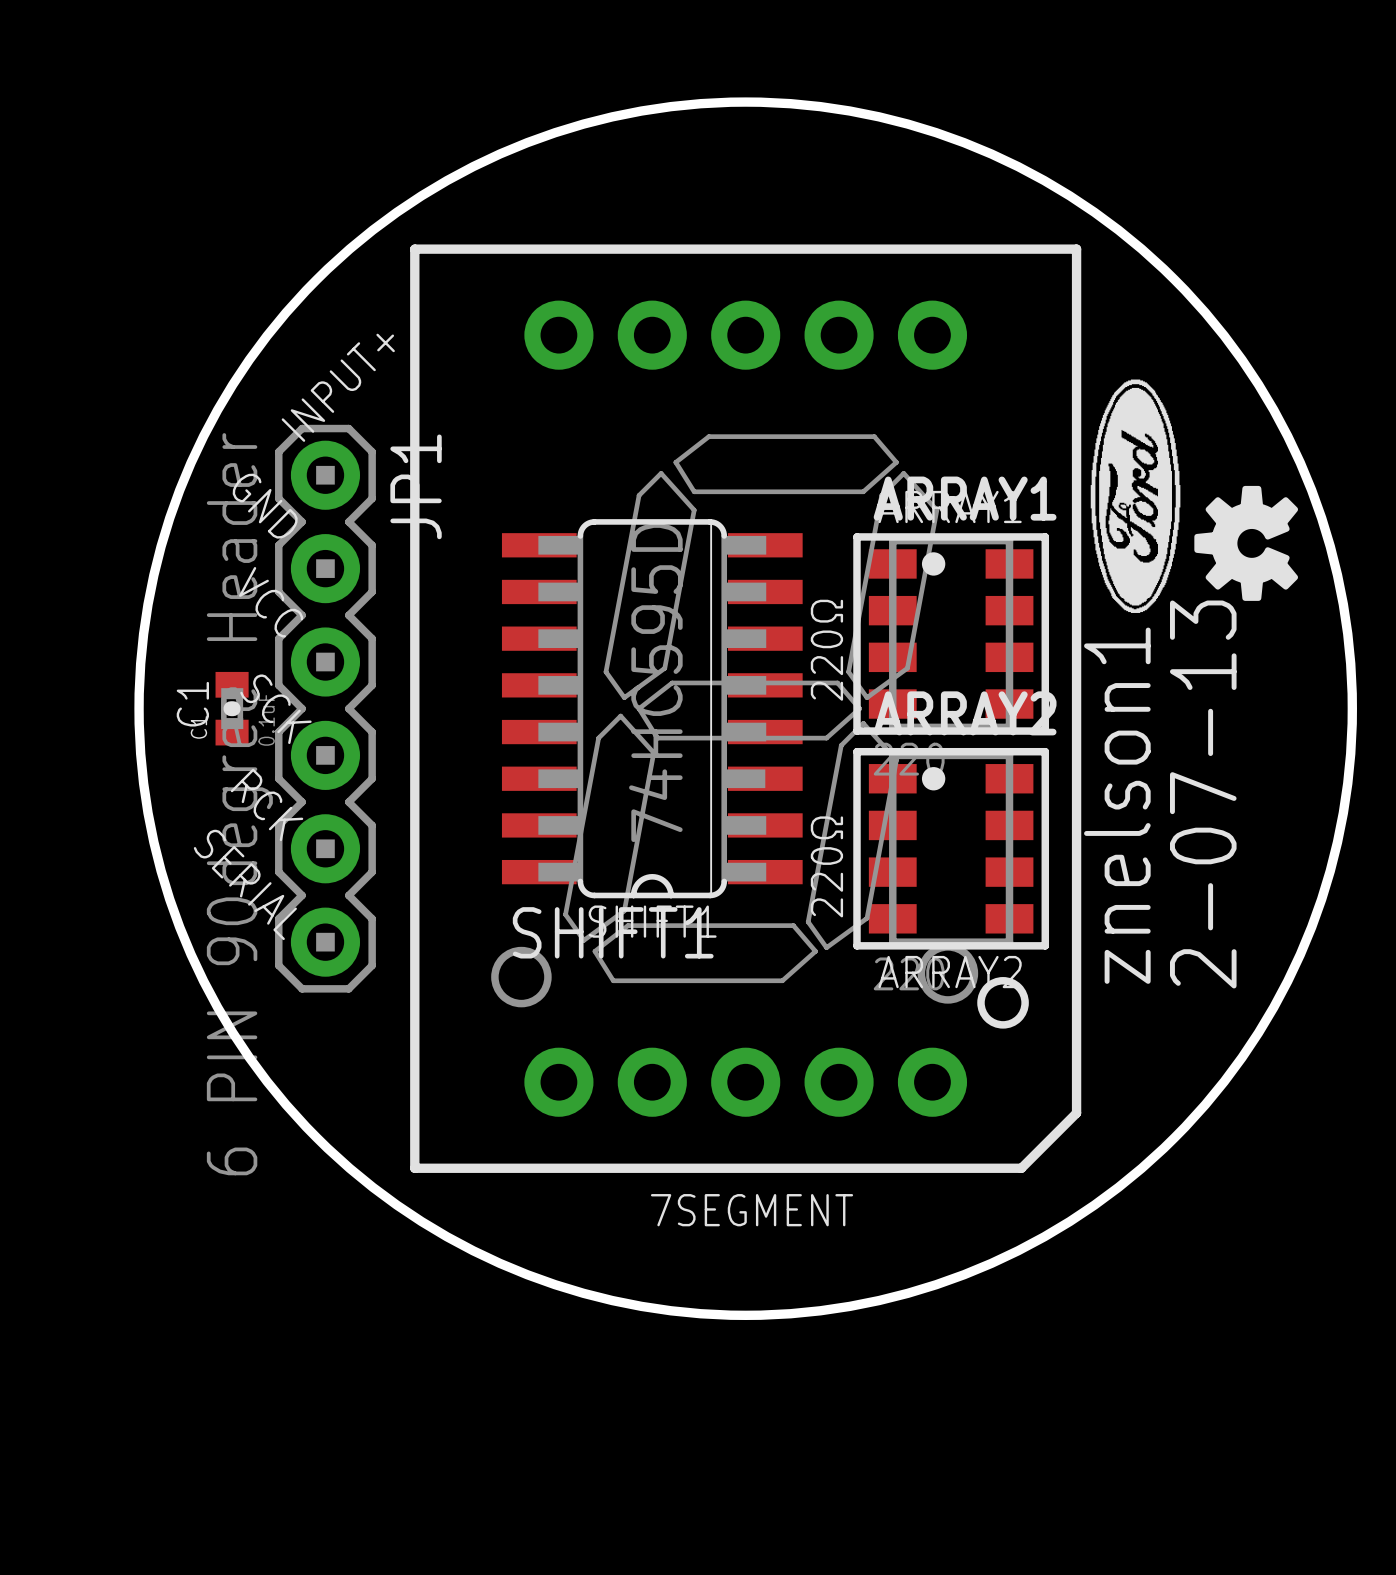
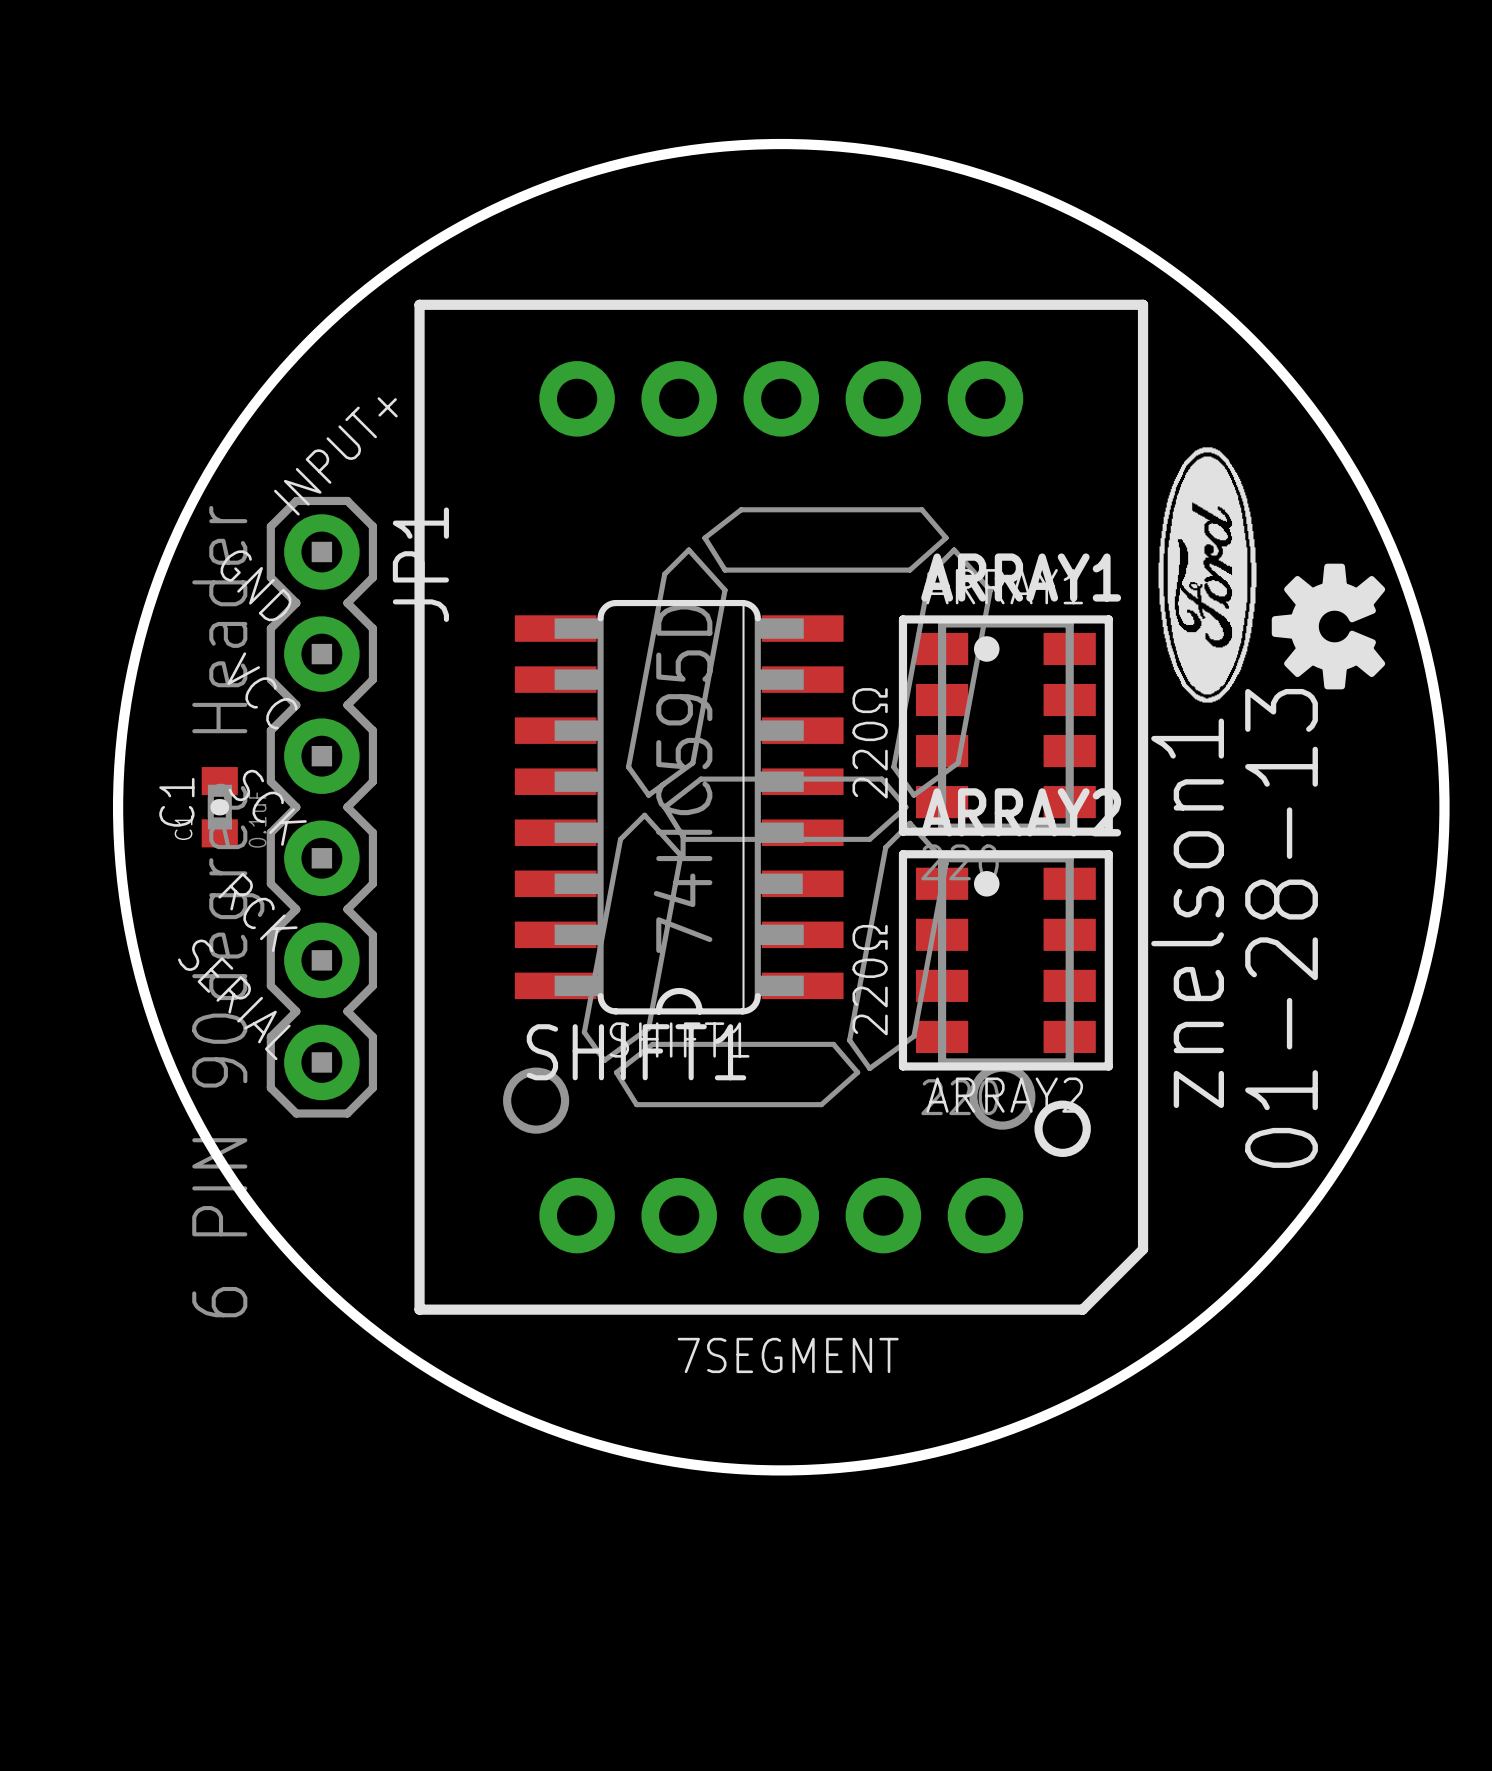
text: 2-07-13 (1203, 794) -> 01-28-13 (1281, 928)

